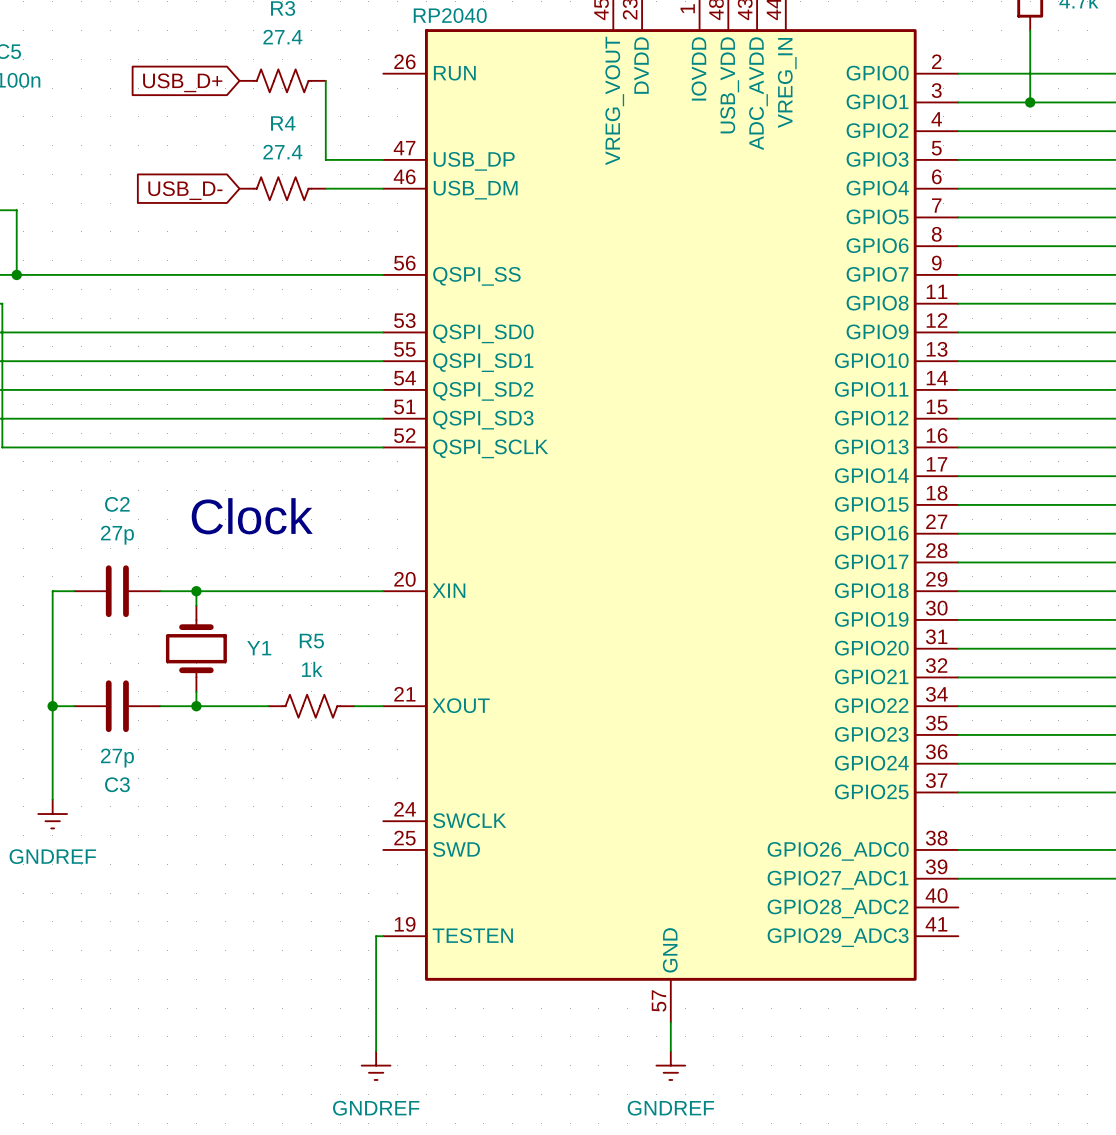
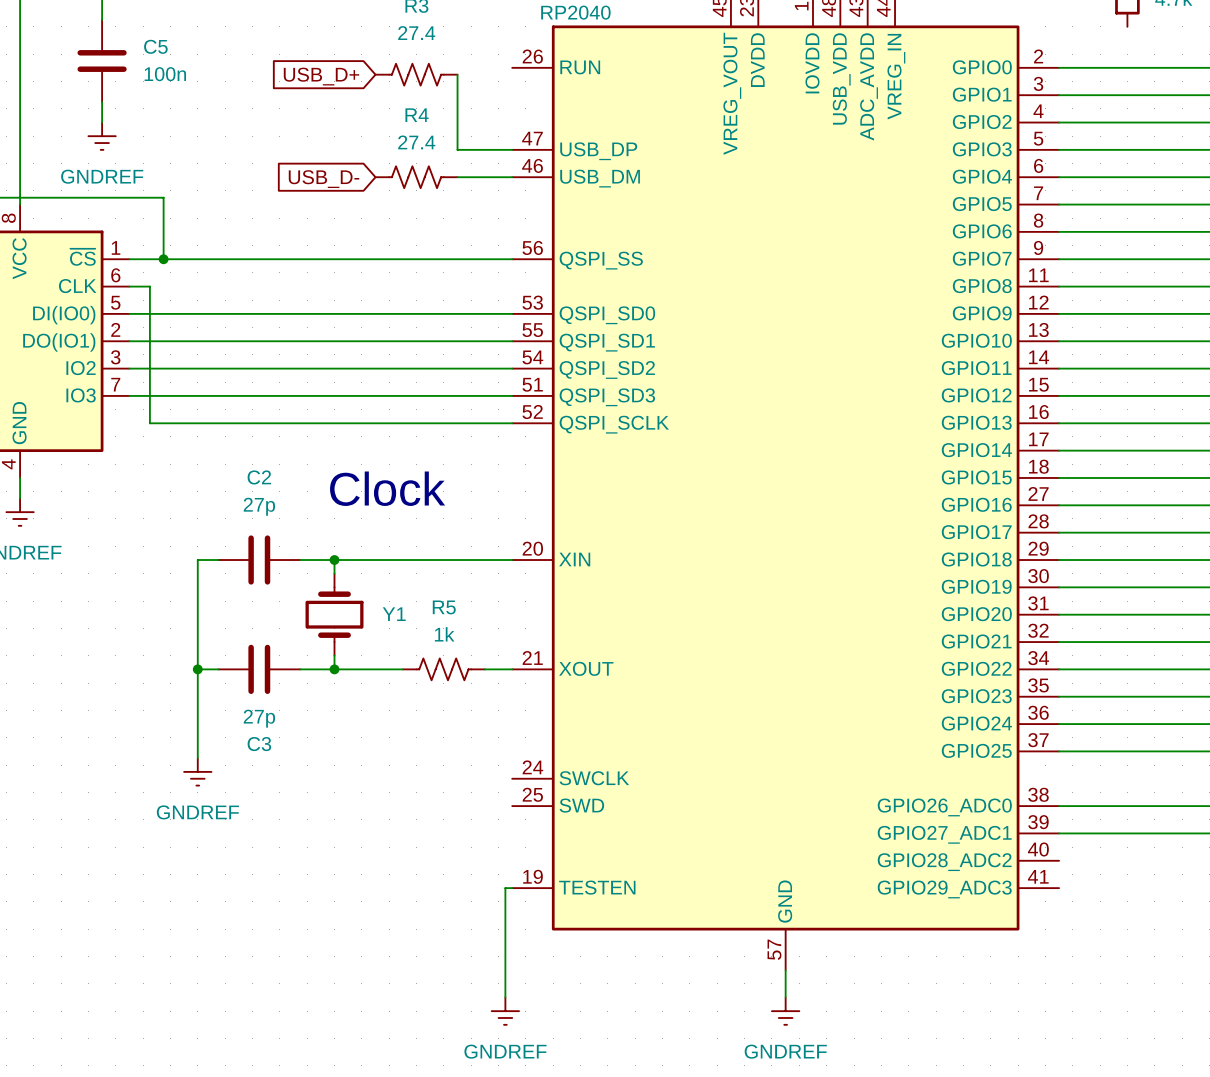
wire: (1030, 30) (1030, 102) -> none
junction: (1030, 102) -> none

